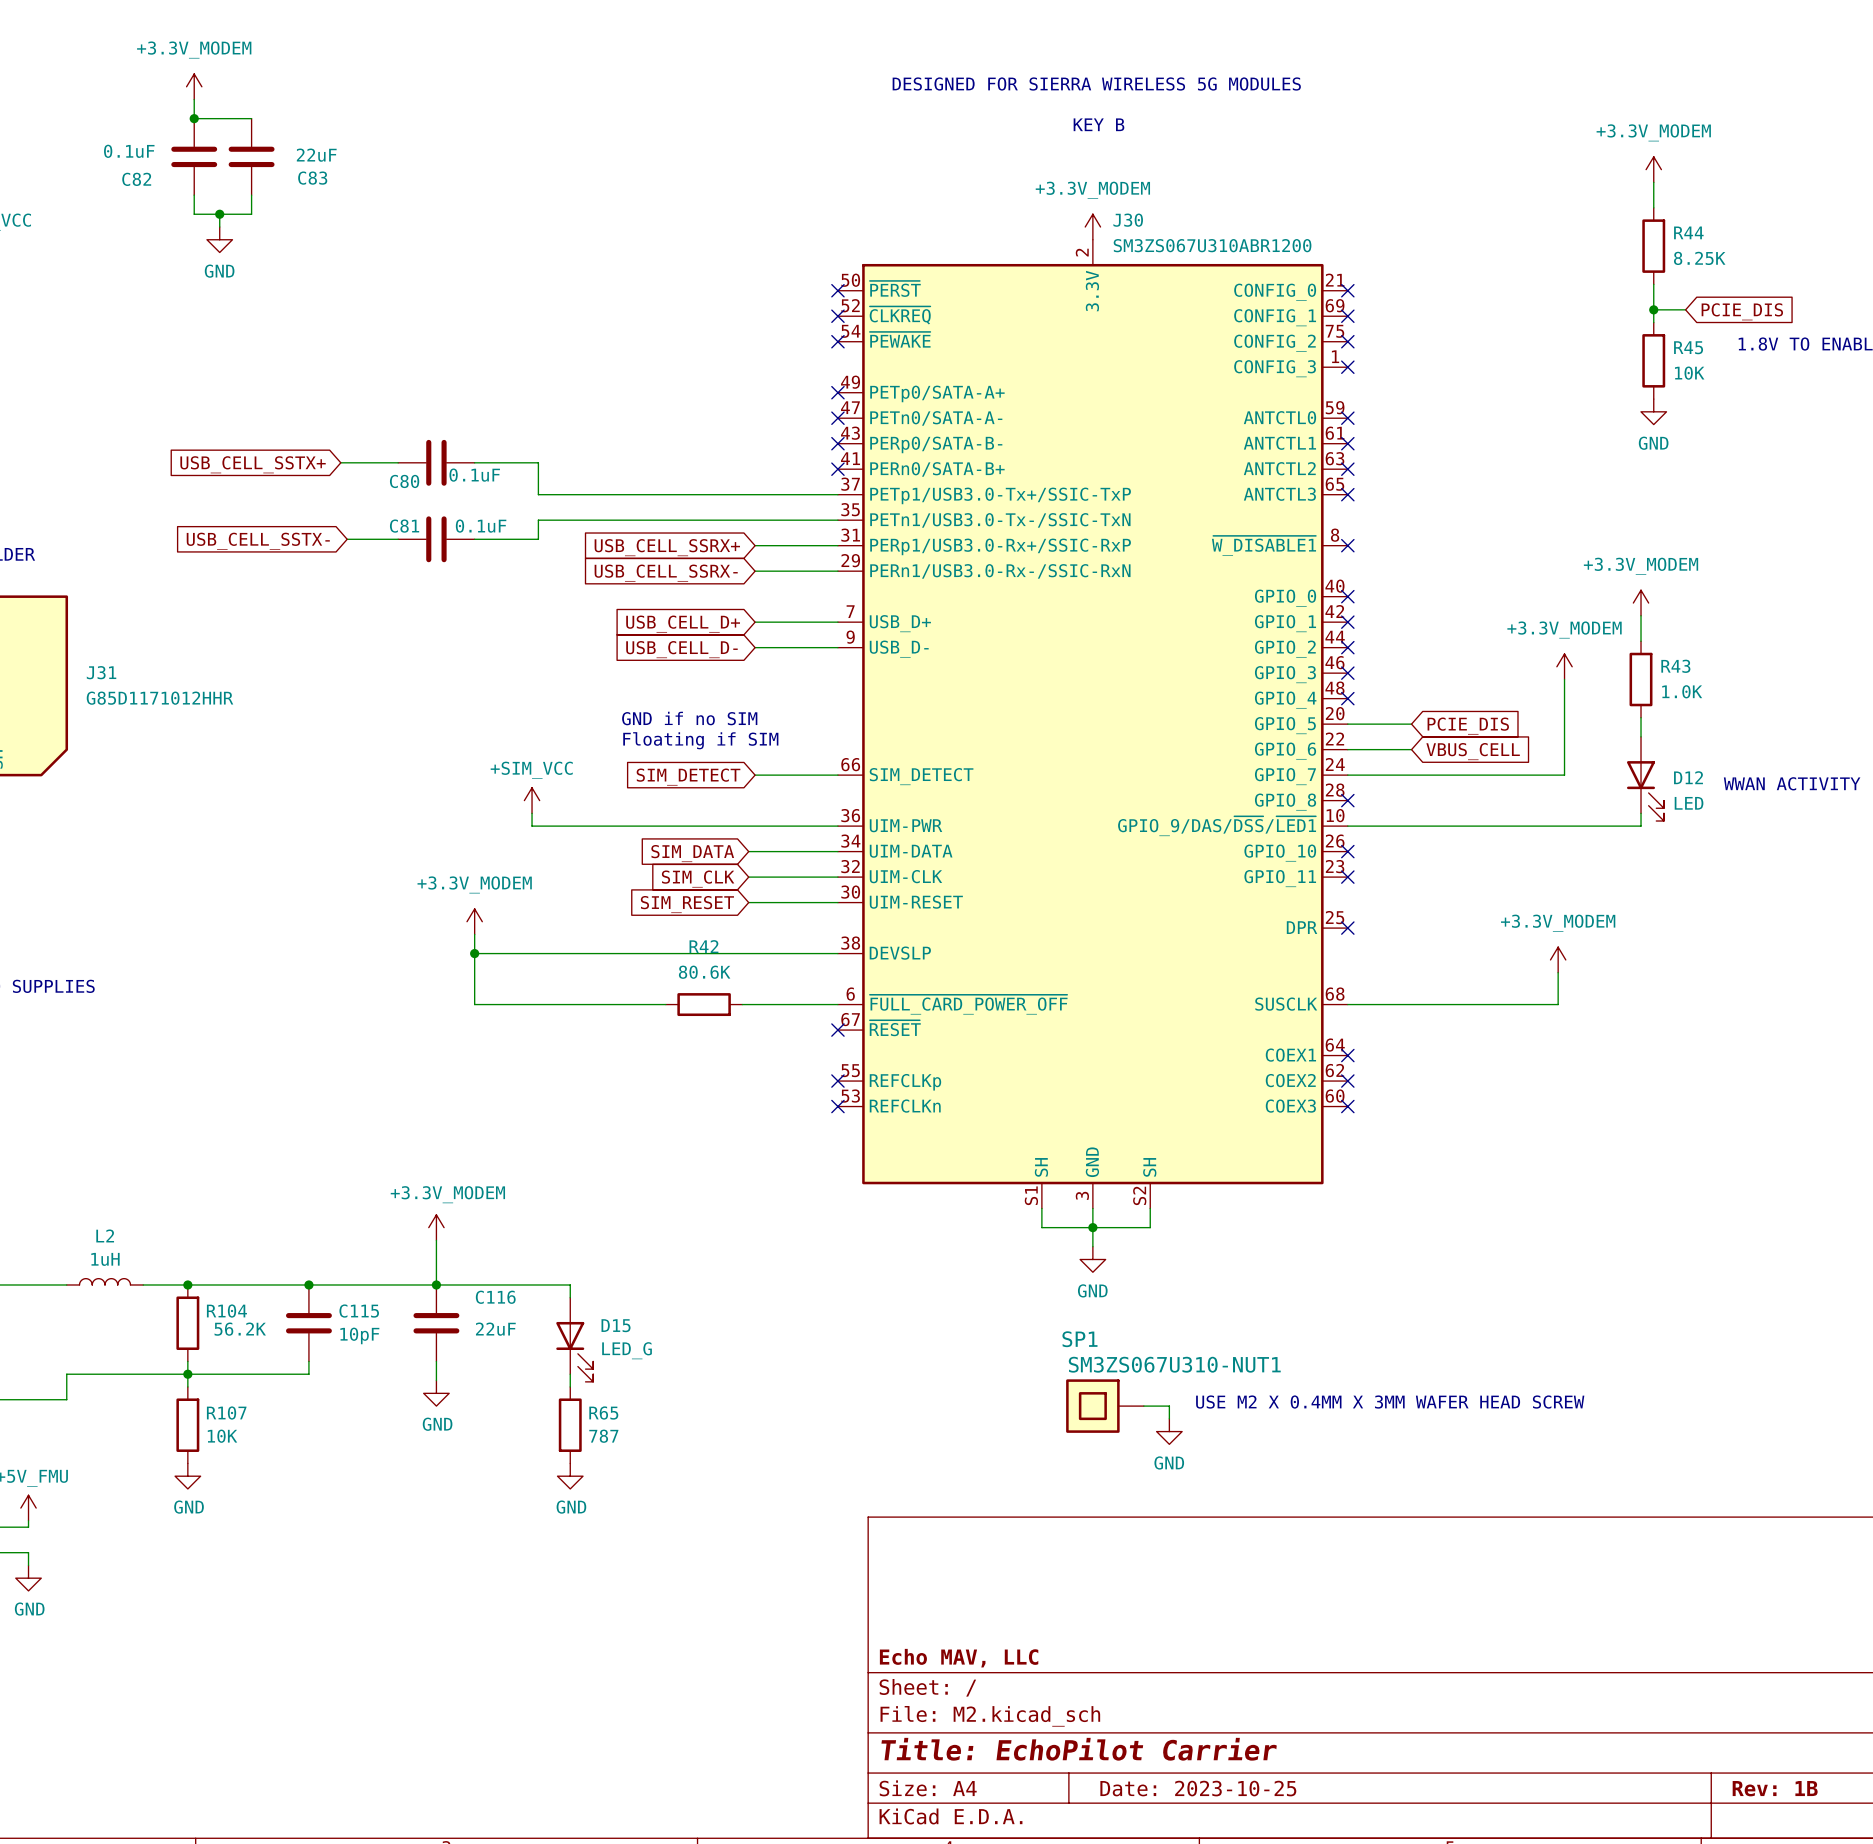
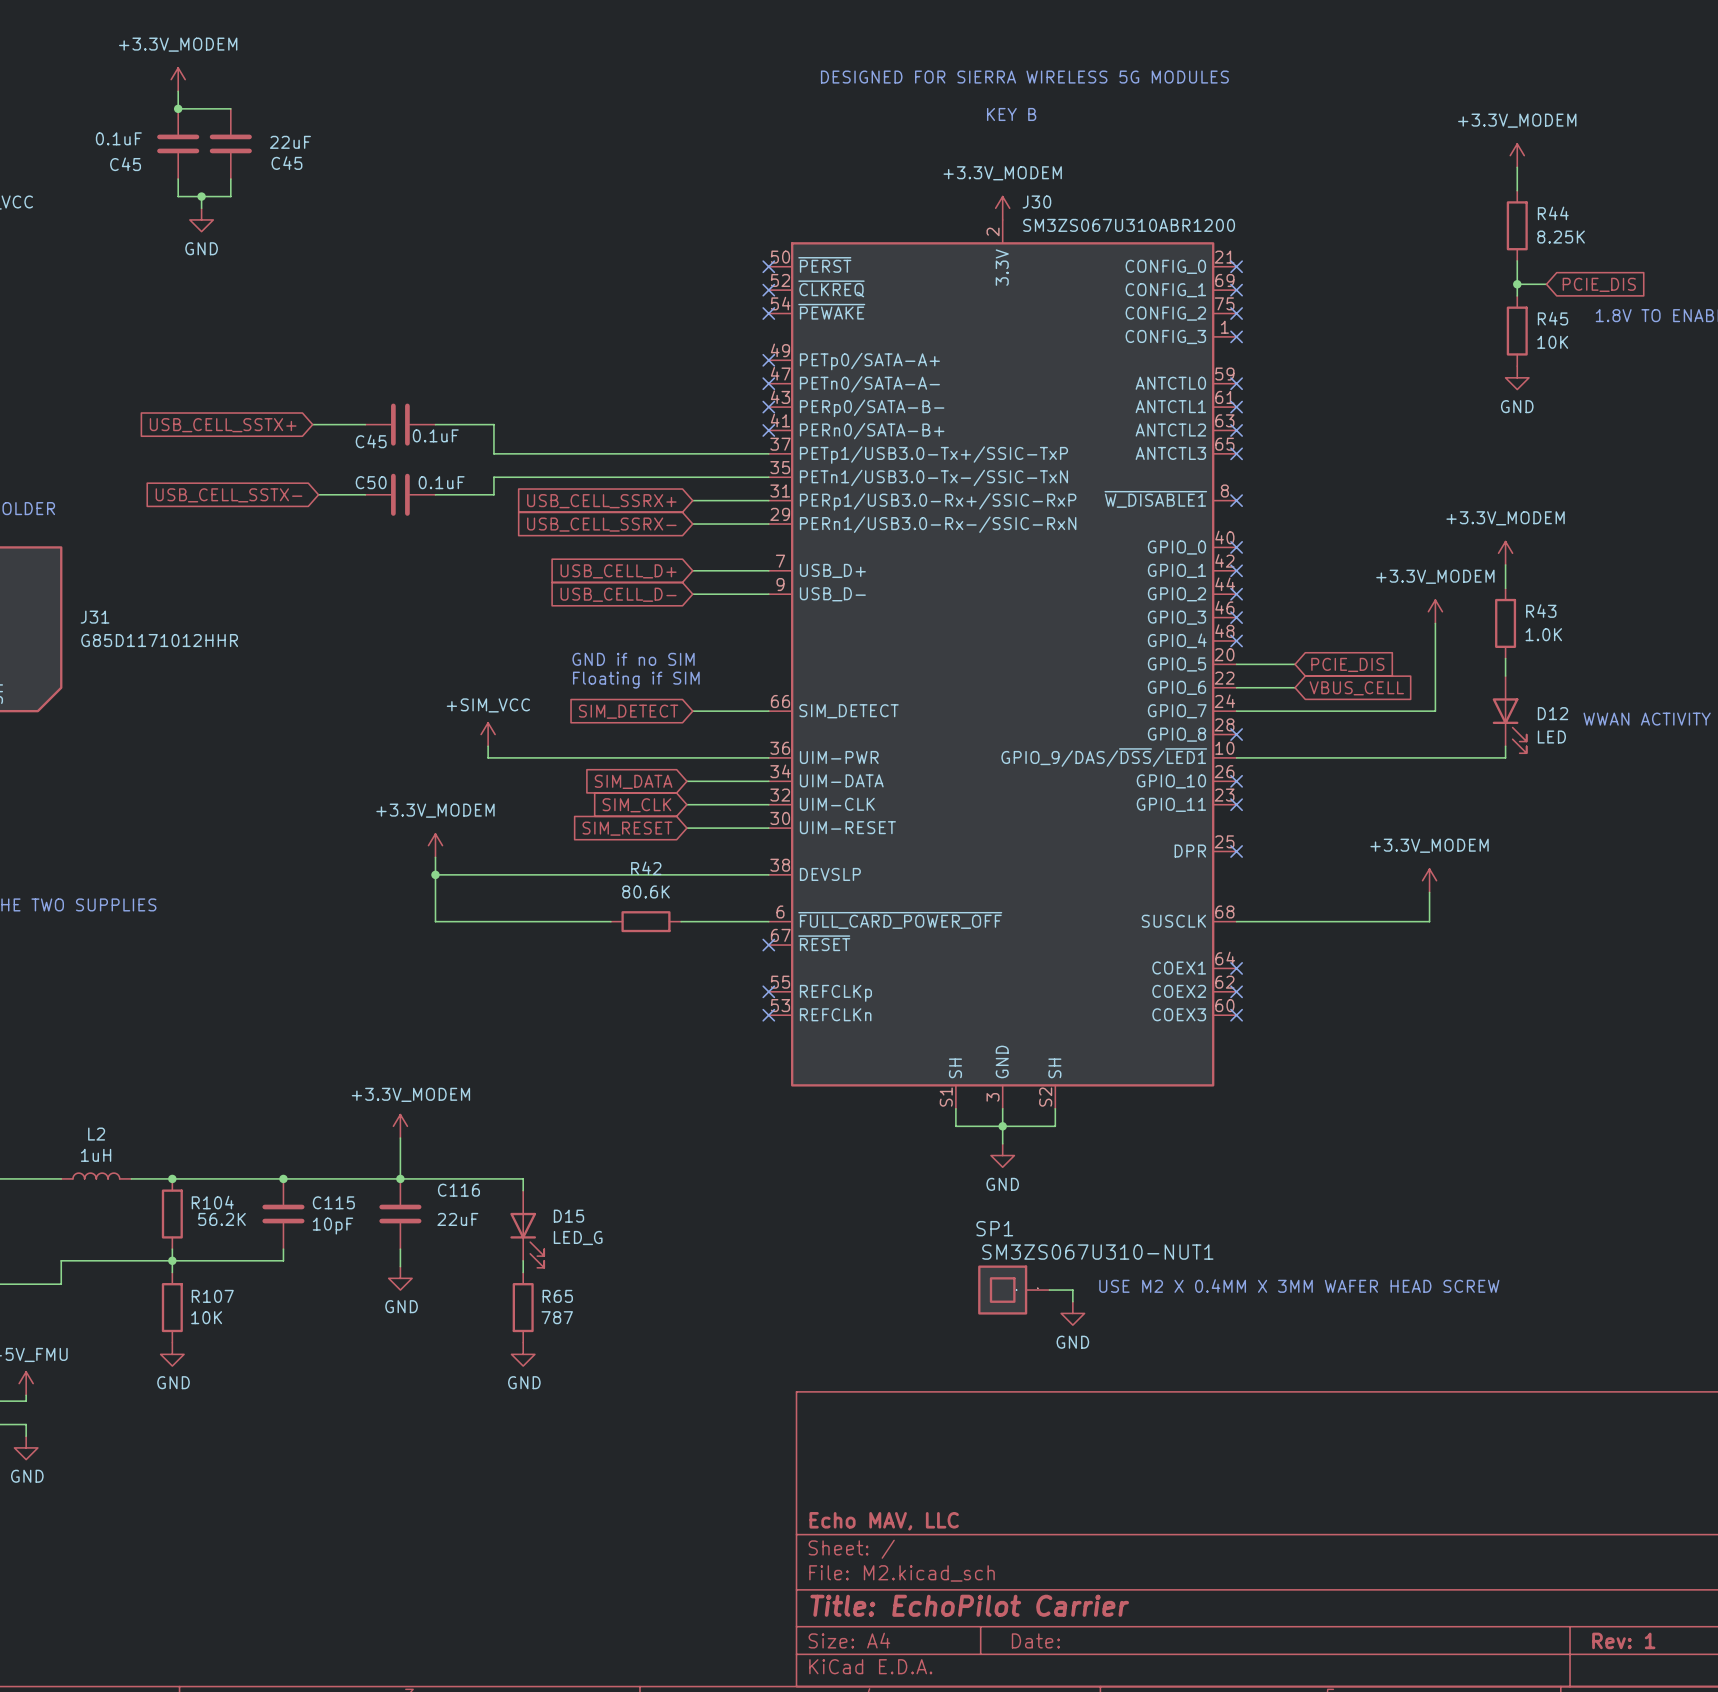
C83 name: C83 (312, 178) -> C45 (286, 163)
C82 name: C82 (136, 179) -> C45 (125, 164)
C80 name: C80 (404, 481) -> C45 (371, 441)
C81 name: C81 (404, 526) -> C50 (371, 482)
title block: Date: 2023-10-25 (1198, 1788) -> Date: (1035, 1640)
title block: Rev: 1B (1775, 1788) -> Rev: 1 (1623, 1640)

